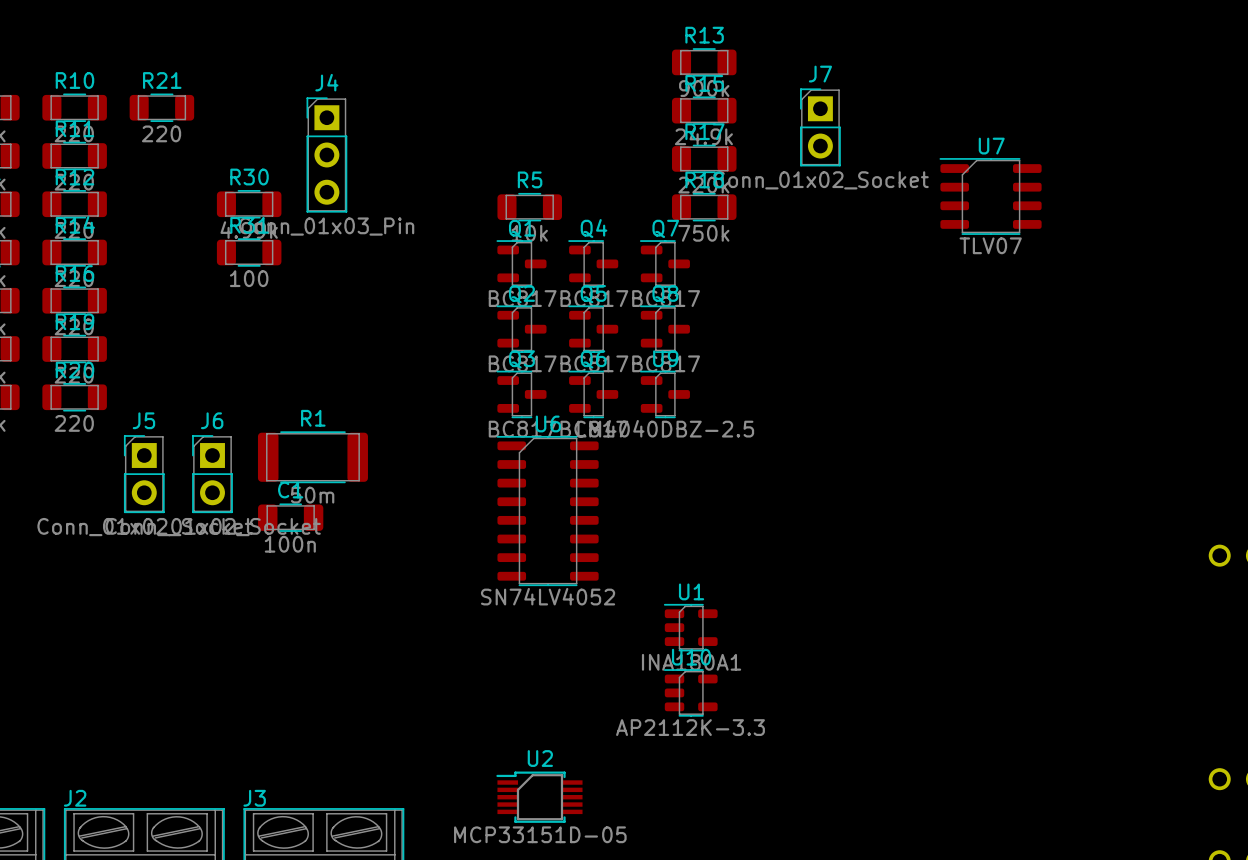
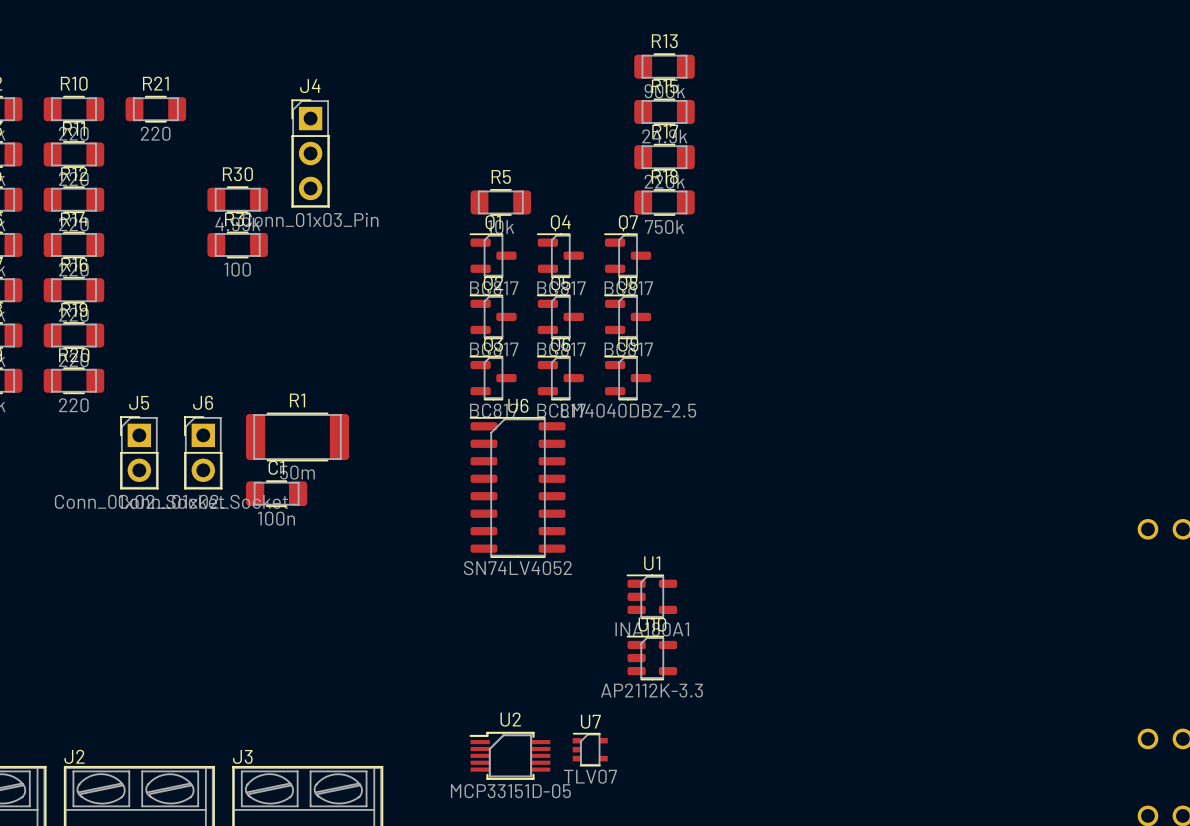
J7: Conn_01x02_Socket (820, 127) -> none
U7 footprint: [939, 158, 1042, 235] -> [572, 732, 608, 767]

